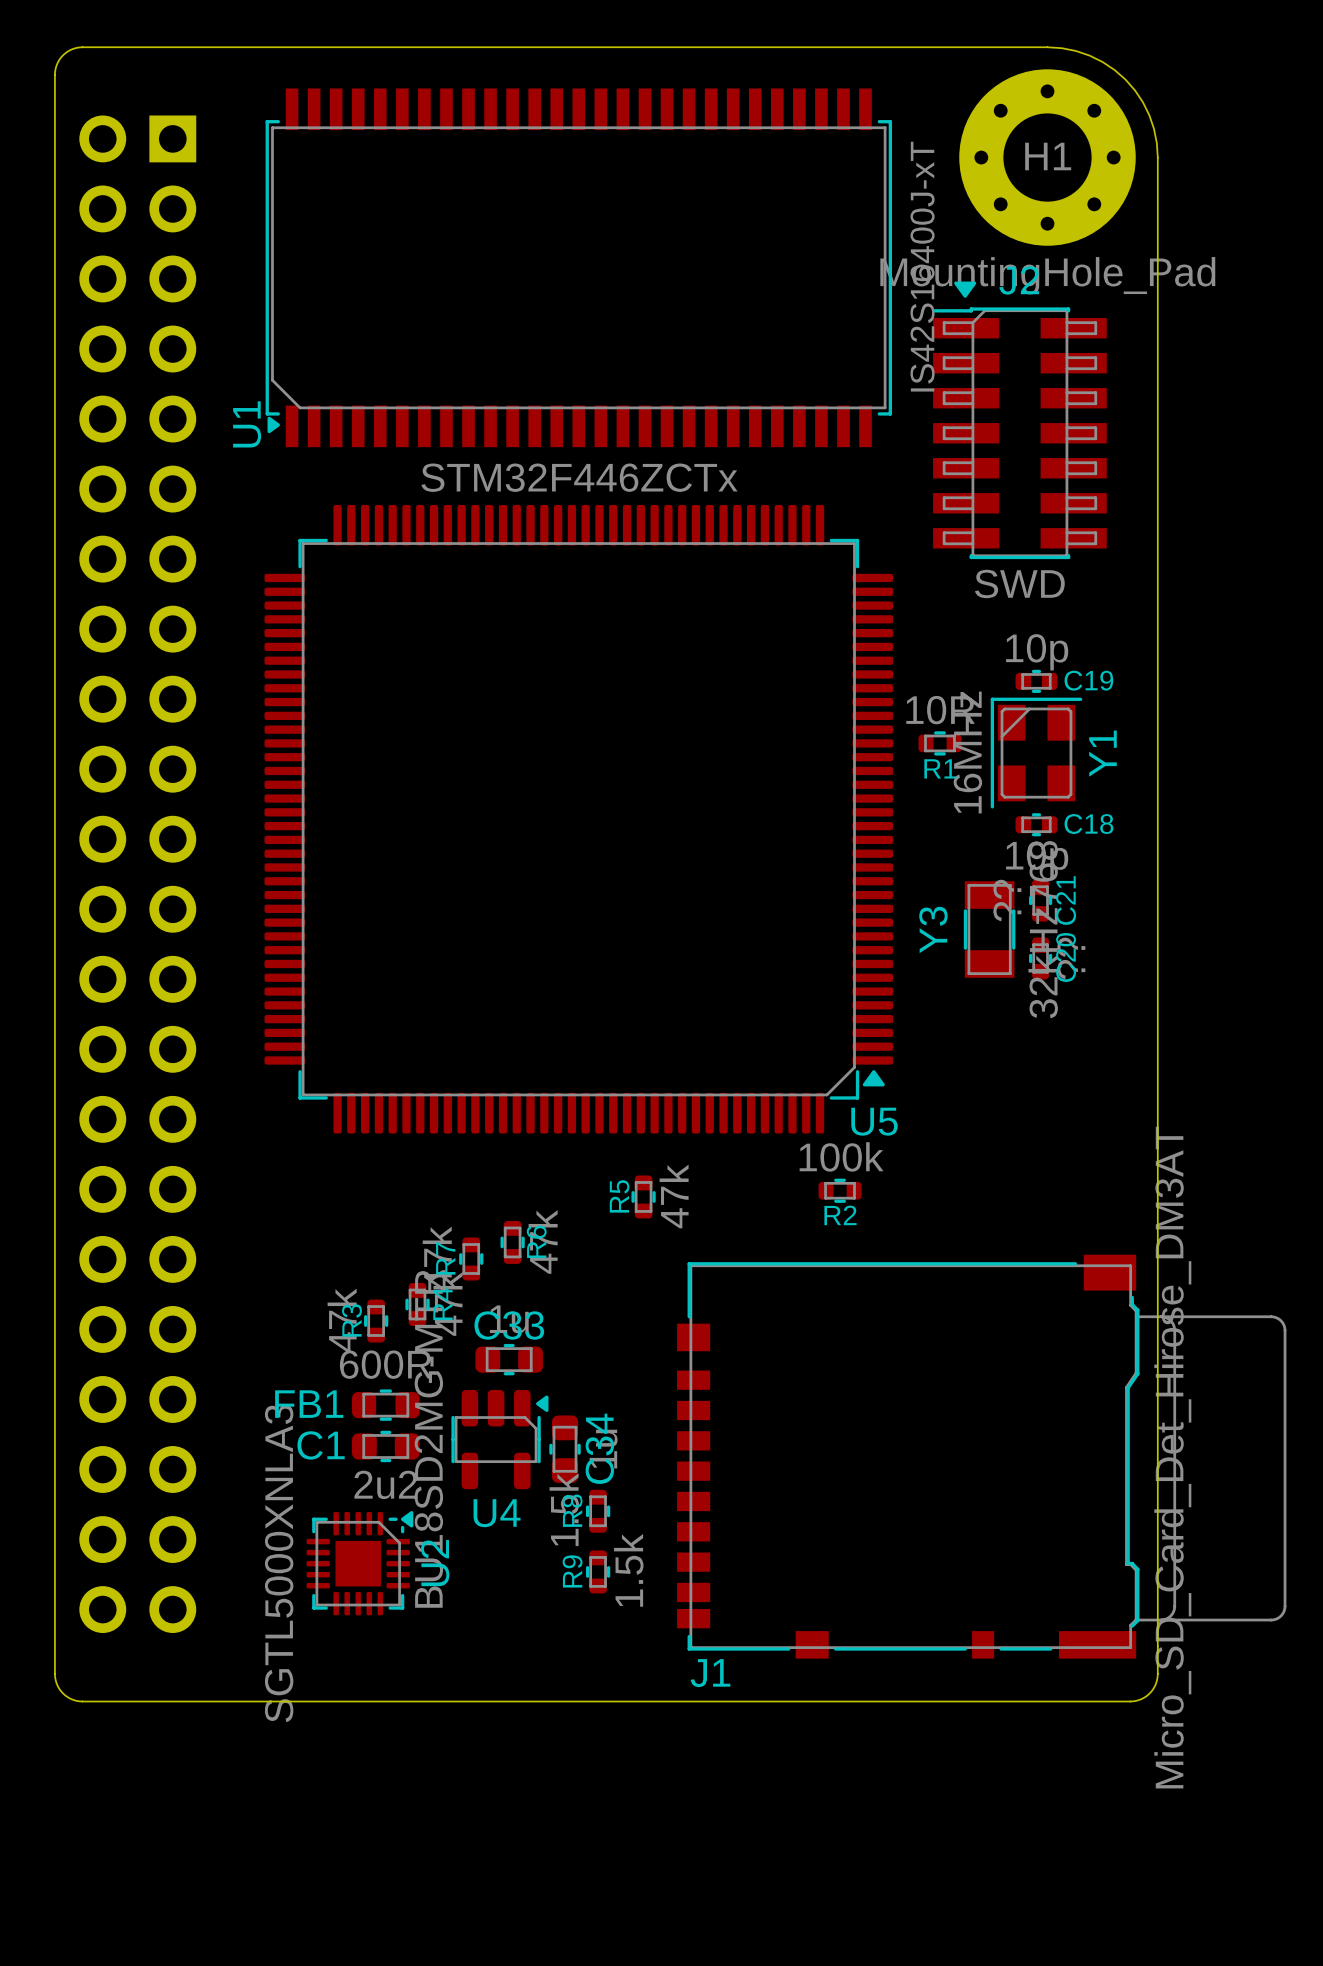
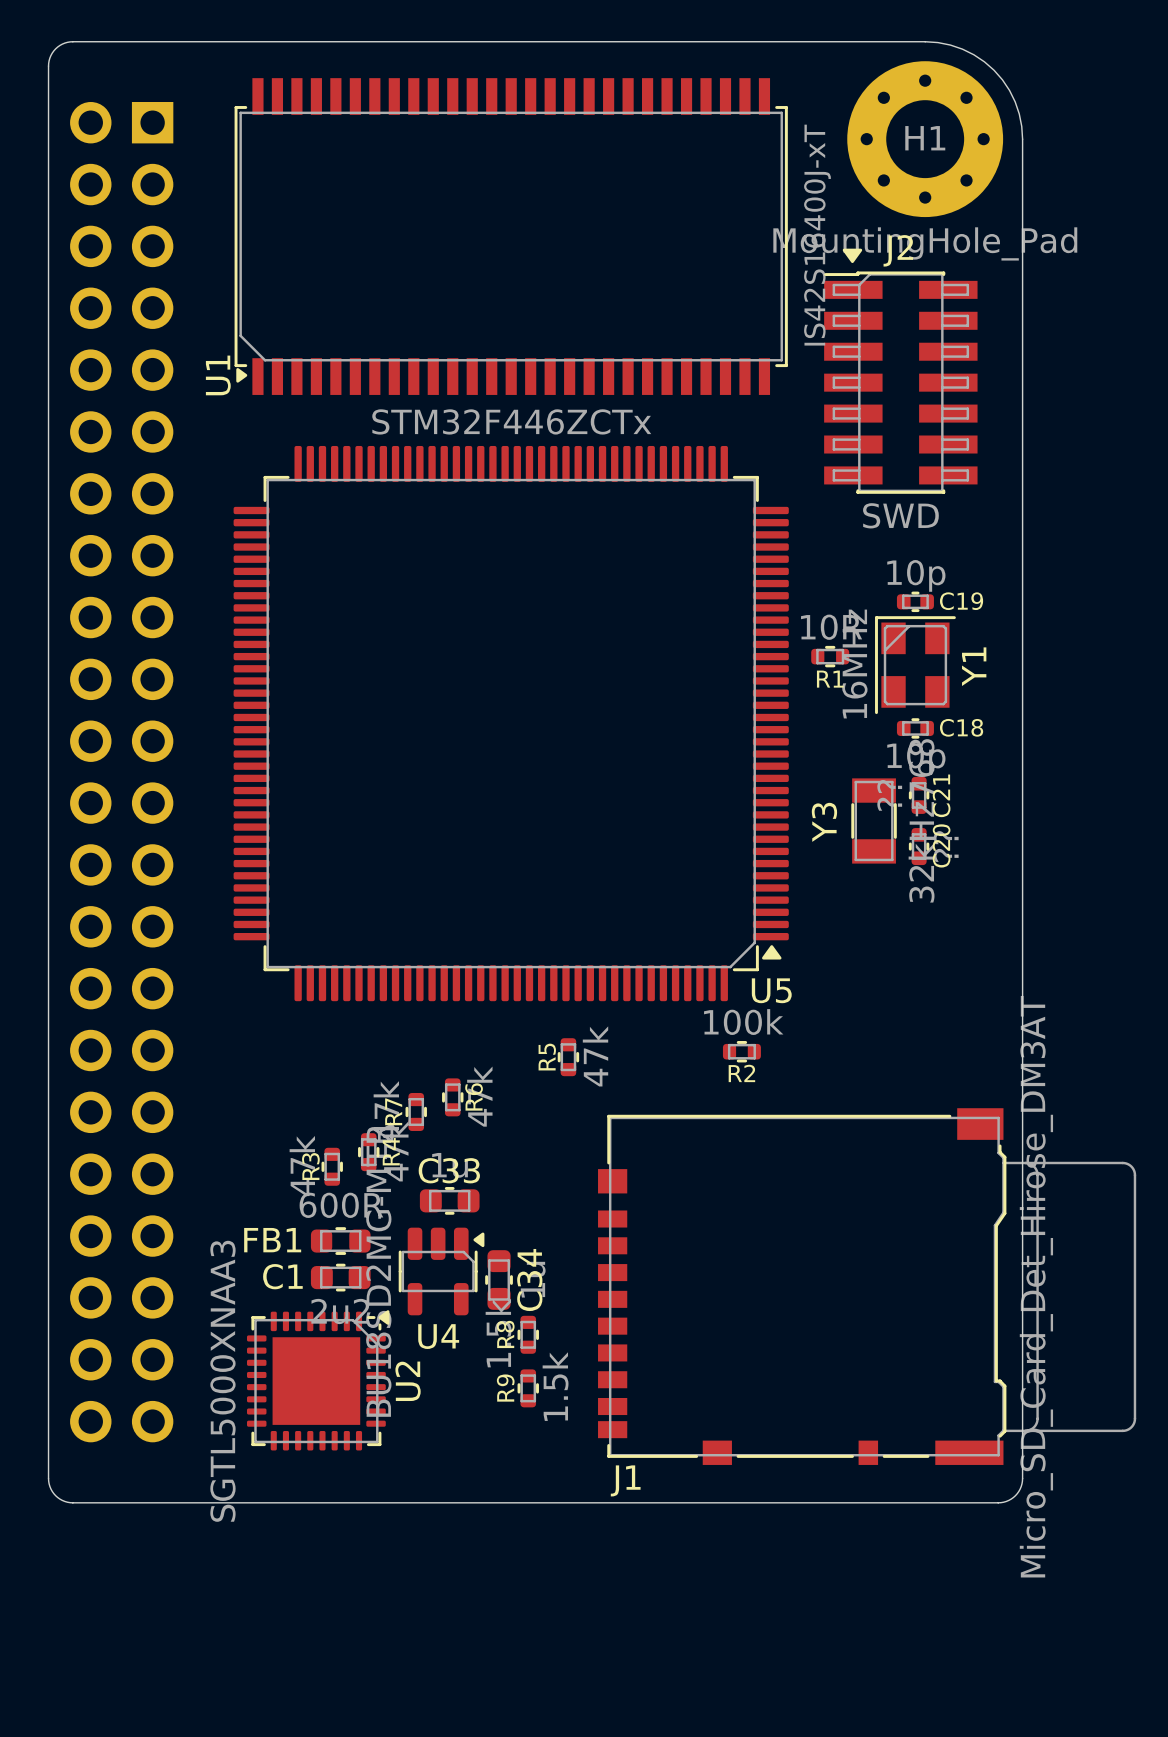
U2 footprint: [306, 1510, 414, 1616] -> [246, 1310, 390, 1451]
U2 value: SGTL5000XNLA3 (279, 1563) -> SGTL5000XNAA3 (222, 1381)

